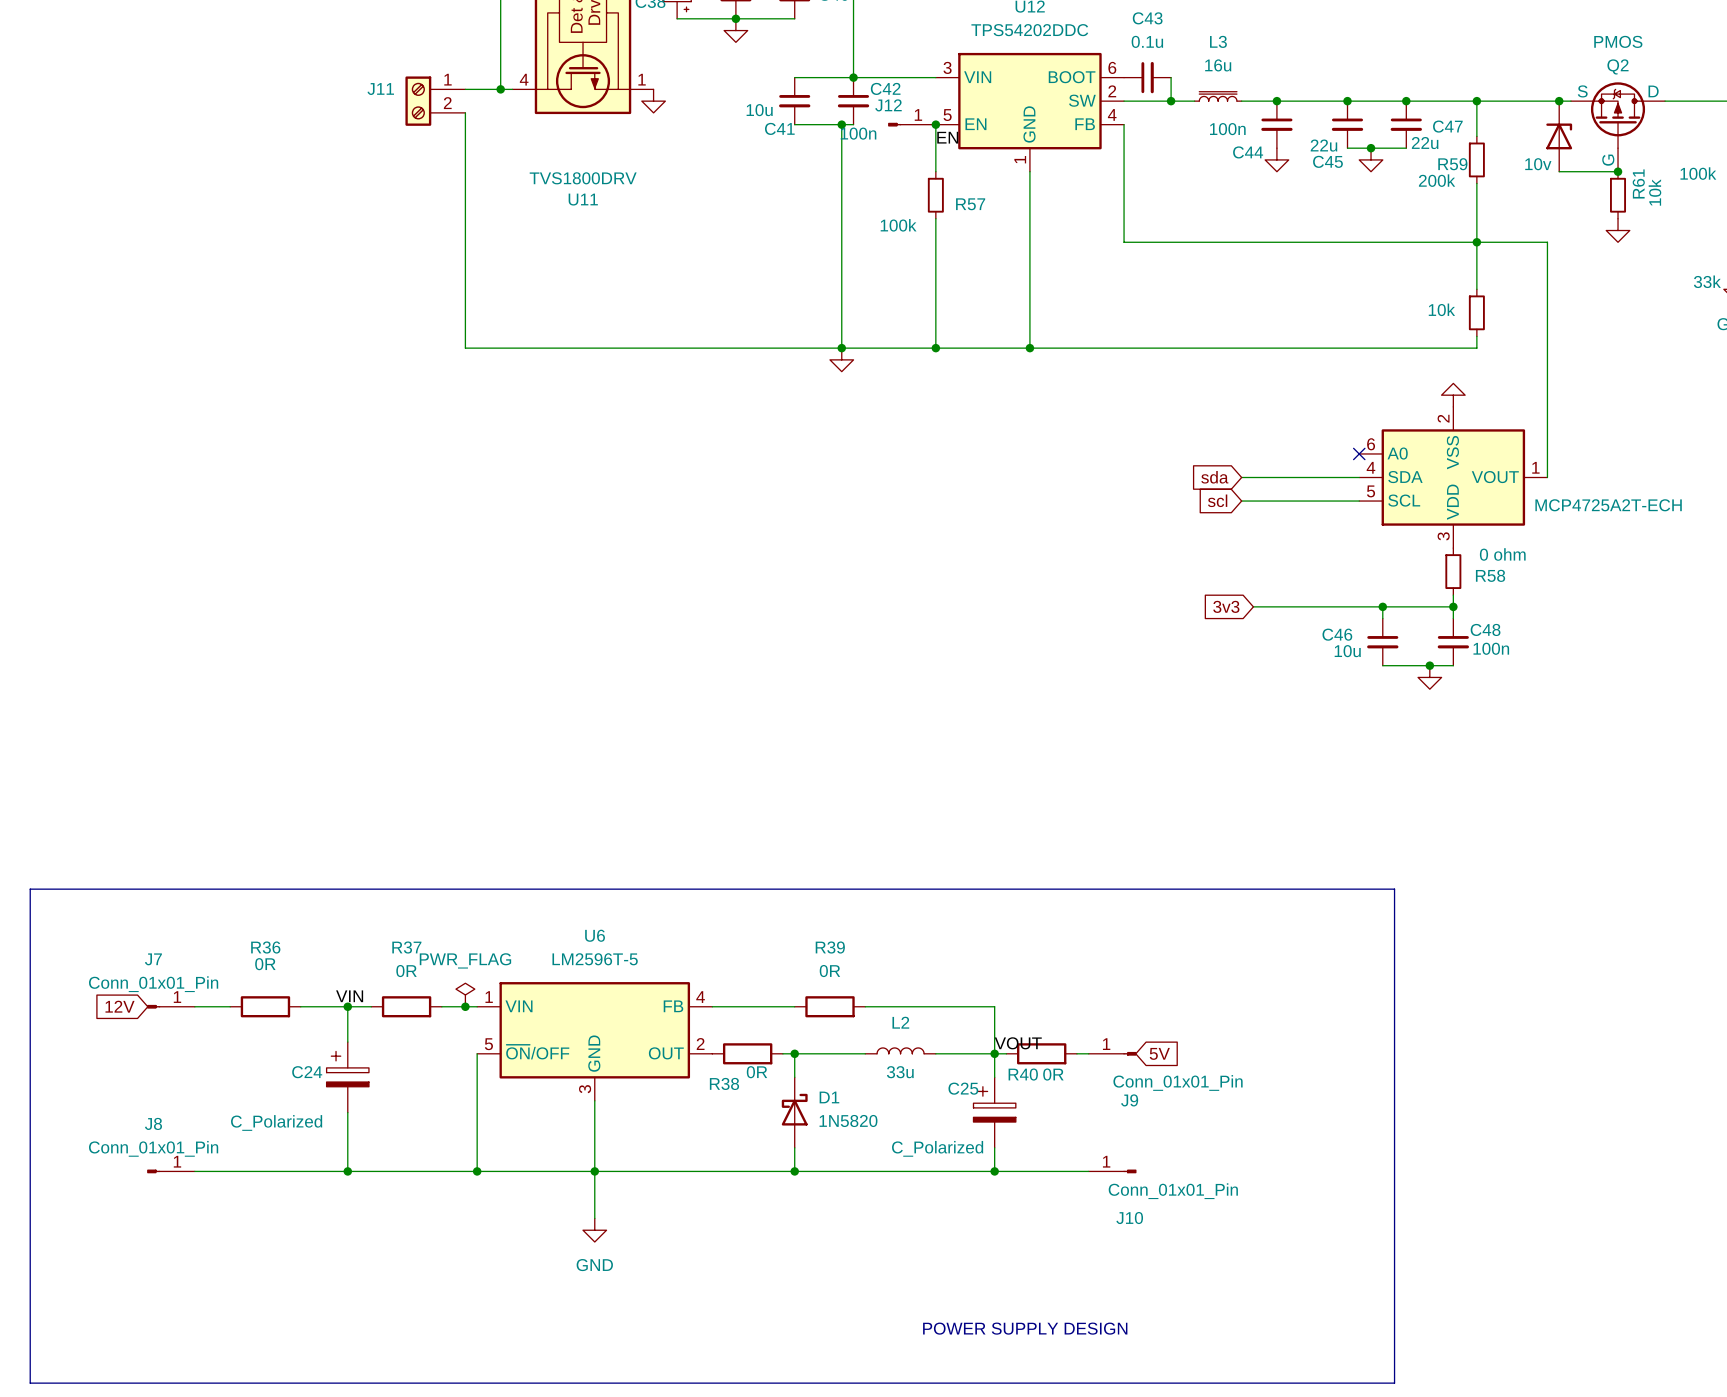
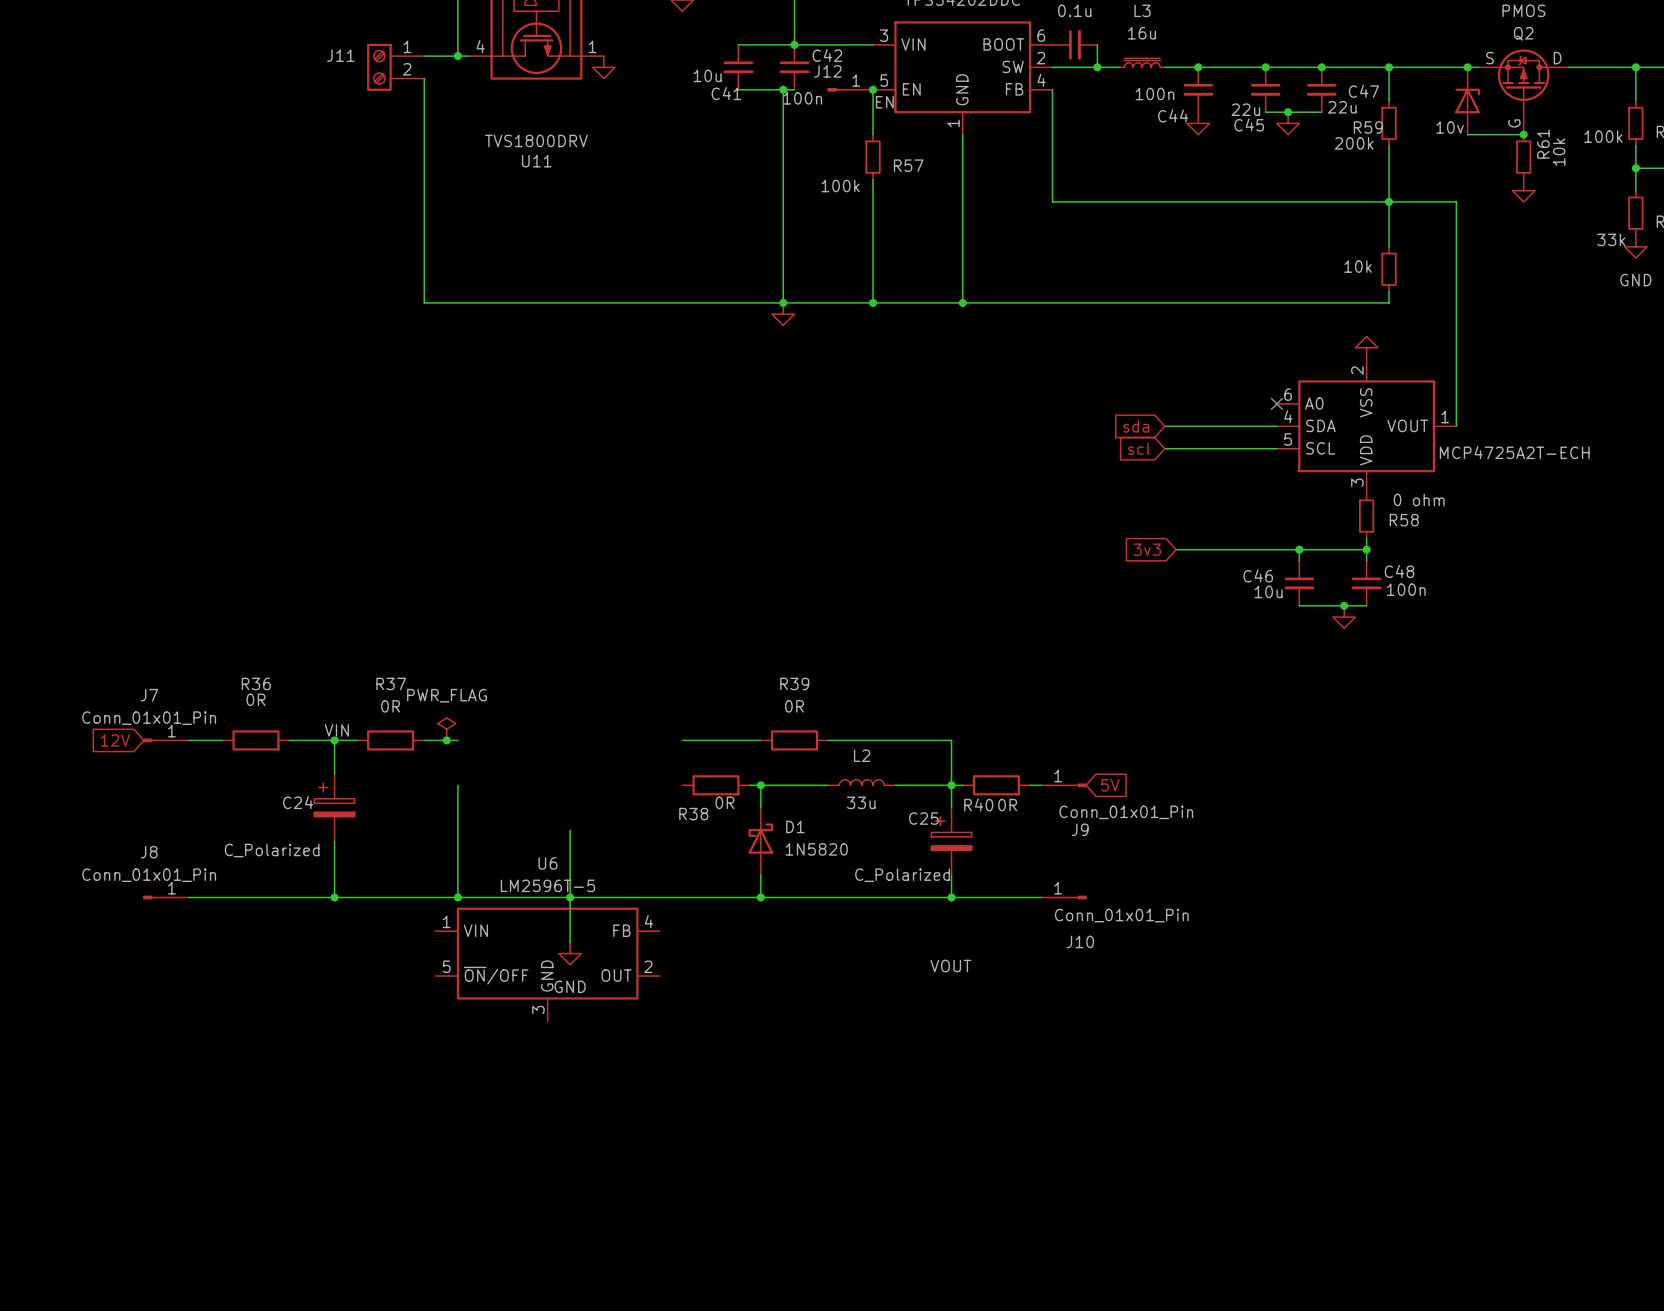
junction: none -> (334, 740)
junction: none -> (446, 740)
junction: none -> (760, 785)
junction: none -> (951, 785)
line: (30, 889) (1394, 889) (1394, 1383) (30, 1383) (30, 889) -> none
junction: none -> (570, 897)
junction: none -> (760, 897)
junction: none -> (951, 897)
power symbol position: PWR_FLAG (465, 995) -> PWR_FLAG (446, 729)
label position: VIN (349, 996) -> VIN (336, 730)
global label position: 12V (120, 1006) -> 12V (115, 740)
J7 position: (171, 1006) -> (165, 740)
wire: (194, 1006) (230, 1006) -> (188, 740) (222, 740)
R36 position: (265, 1006) -> (256, 740)
wire: (300, 1006) (371, 1006) -> (289, 740) (356, 740)
wire: (347, 1006) (347, 1042) -> (334, 740) (334, 774)
junction position: (347, 1006) -> (334, 897)
R37 position: (406, 1006) -> (390, 740)
wire: (441, 1006) (477, 1006) -> (424, 740) (457, 740)
junction position: (465, 1006) -> (457, 897)
wire: (712, 1006) (794, 1006) -> (682, 740) (760, 740)
R39 position: (830, 1006) -> (794, 740)
wire: (865, 1006) (994, 1006) (994, 1077) -> (828, 740) (951, 740) (951, 807)
L2 position: (900, 1050) -> (861, 782)
wire: (477, 1053) (477, 1171) -> (457, 785) (457, 897)
R38 position: (747, 1053) -> (715, 785)
wire: (782, 1053) (865, 1053) -> (749, 785) (828, 785)
wire: (794, 1053) (794, 1077) -> (760, 785) (760, 807)
junction: (794, 1053) -> none
wire: (935, 1053) (1006, 1053) -> (895, 785) (962, 785)
junction: (994, 1053) -> none
R40 position: (1041, 1053) -> (996, 785)
wire: (1076, 1053) (1088, 1053) -> (1030, 785) (1041, 785)
J9 position: (1112, 1053) -> (1064, 785)
global label position: 5V (1159, 1053) -> 5V (1110, 785)
C24 position: (347, 1077) -> (334, 807)
wire: (594, 1100) (594, 1218) -> (570, 830) (570, 942)
wire: (347, 1112) (347, 1171) -> (334, 841) (334, 897)
D1 position: (794, 1112) -> (760, 841)
C25 position: (994, 1112) -> (951, 841)
wire: (794, 1147) (794, 1171) -> (760, 875) (760, 897)
wire: (994, 1147) (994, 1171) -> (951, 875) (951, 897)
J8 position: (171, 1171) -> (165, 897)
wire: (194, 1171) (1088, 1171) -> (188, 897) (1041, 897)
junction: (347, 1171) -> none
junction: (477, 1171) -> none
junction: (594, 1171) -> none
junction: (794, 1171) -> none
junction: (994, 1171) -> none
J10 position: (1112, 1171) -> (1064, 897)
power symbol position: GND (594, 1230) -> GND (570, 953)
text: POWER SUPPLY DESIGN (1025, 1328) -> none

